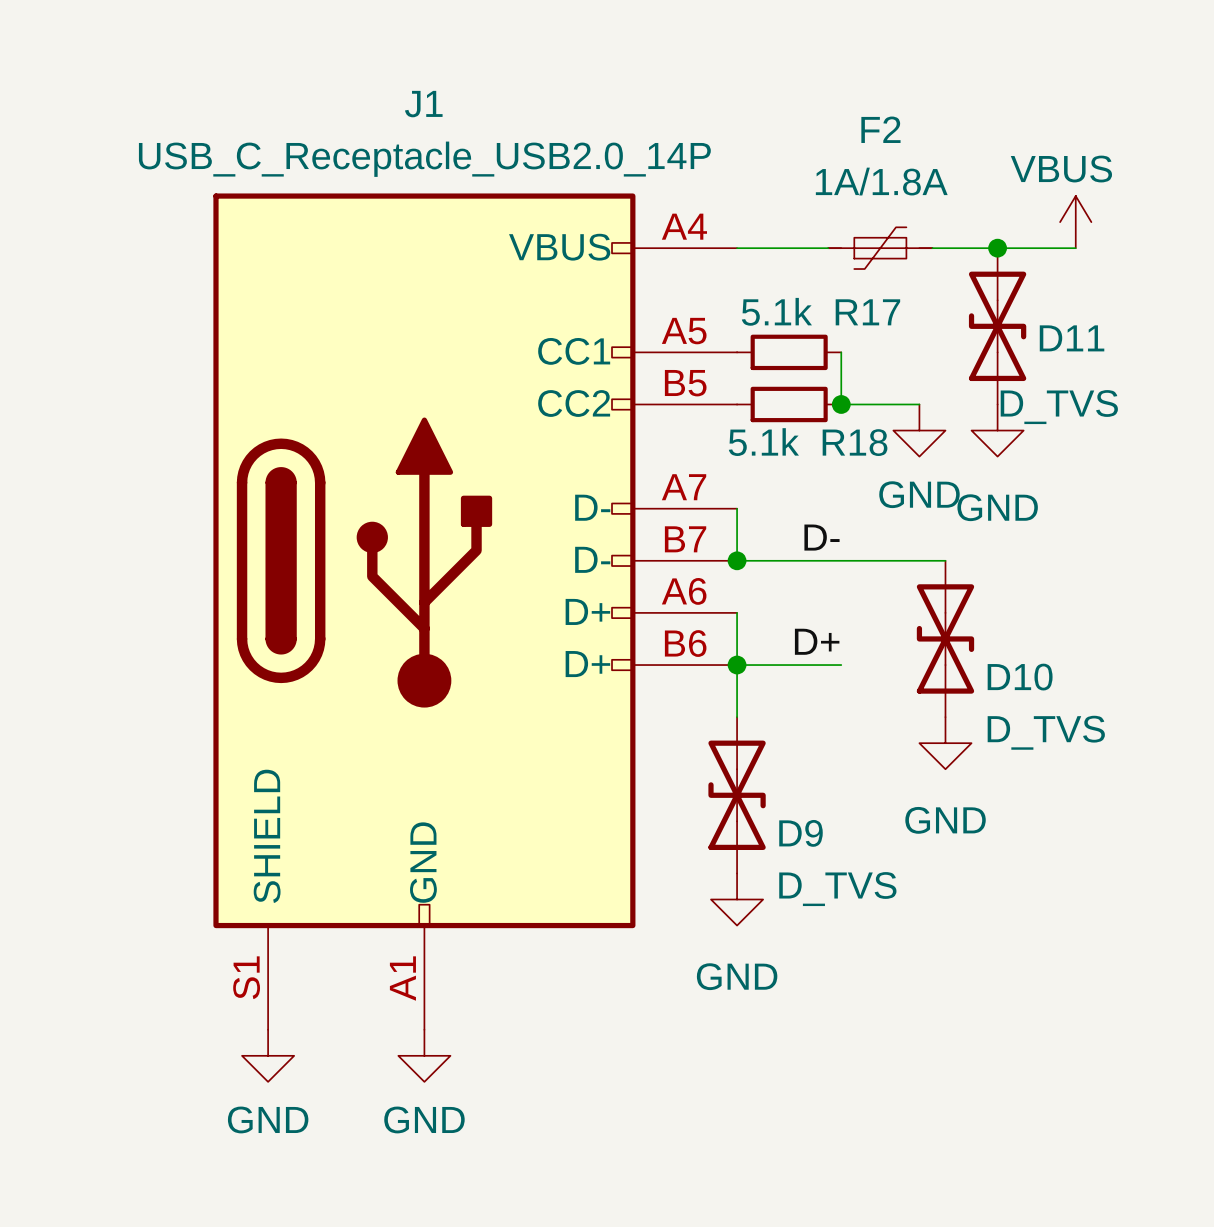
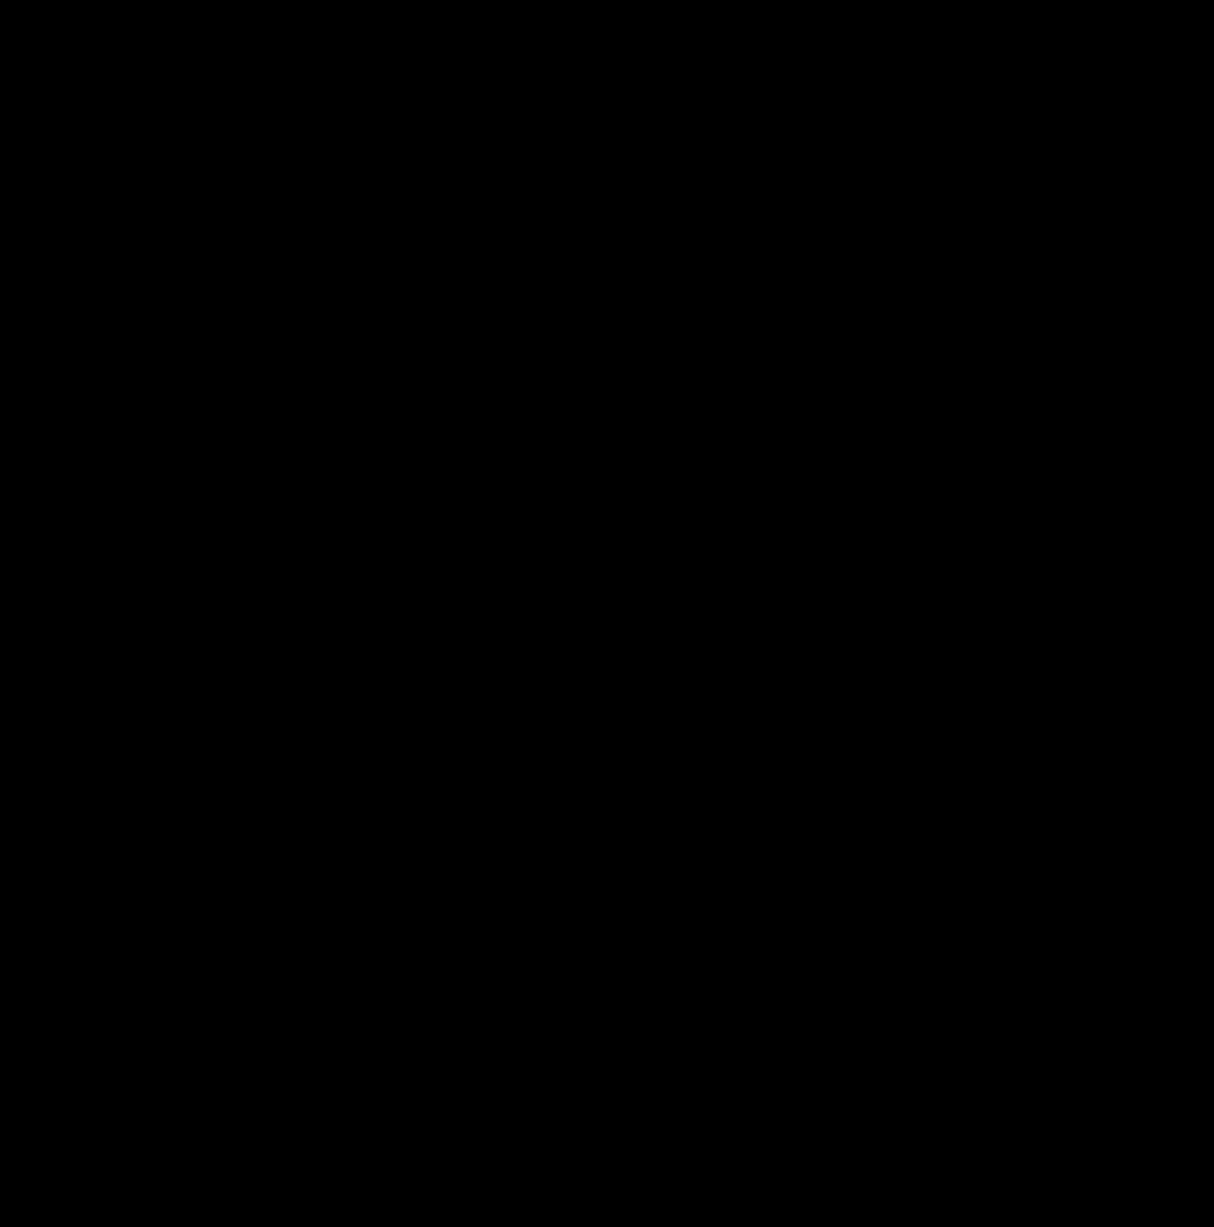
power symbol: VBUS (1075, 222) -> none
wire: (737, 248) (828, 248) -> none
F2: 1A/1.8A (880, 248) -> none
wire: (932, 248) (1075, 248) -> none
junction: (997, 248) -> none
D11: D_TVS (997, 326) -> none
R17: 5.1k (789, 352) -> none
wire: (841, 352) (841, 404) (919, 404) -> none
R18: 5.1k (789, 404) -> none
junction: (841, 404) -> none
power symbol: GND (919, 430) -> none
power symbol: GND (997, 430) -> none
wire: (737, 508) (737, 560) (945, 560) -> none
label: D- (822, 537) -> none
junction: (737, 560) -> none
J1: USB_C_Receptacle_USB2.0_14P (475, 611) -> none
wire: (737, 612) (737, 717) -> none
D10: D_TVS (945, 638) -> none
label: D+ (817, 641) -> none
wire: (737, 665) (841, 665) -> none
junction: (737, 665) -> none
power symbol: GND (945, 743) -> none
D9: D_TVS (737, 795) -> none
power symbol: GND (737, 899) -> none
power symbol: GND (268, 1055) -> none
power symbol: GND (424, 1055) -> none

